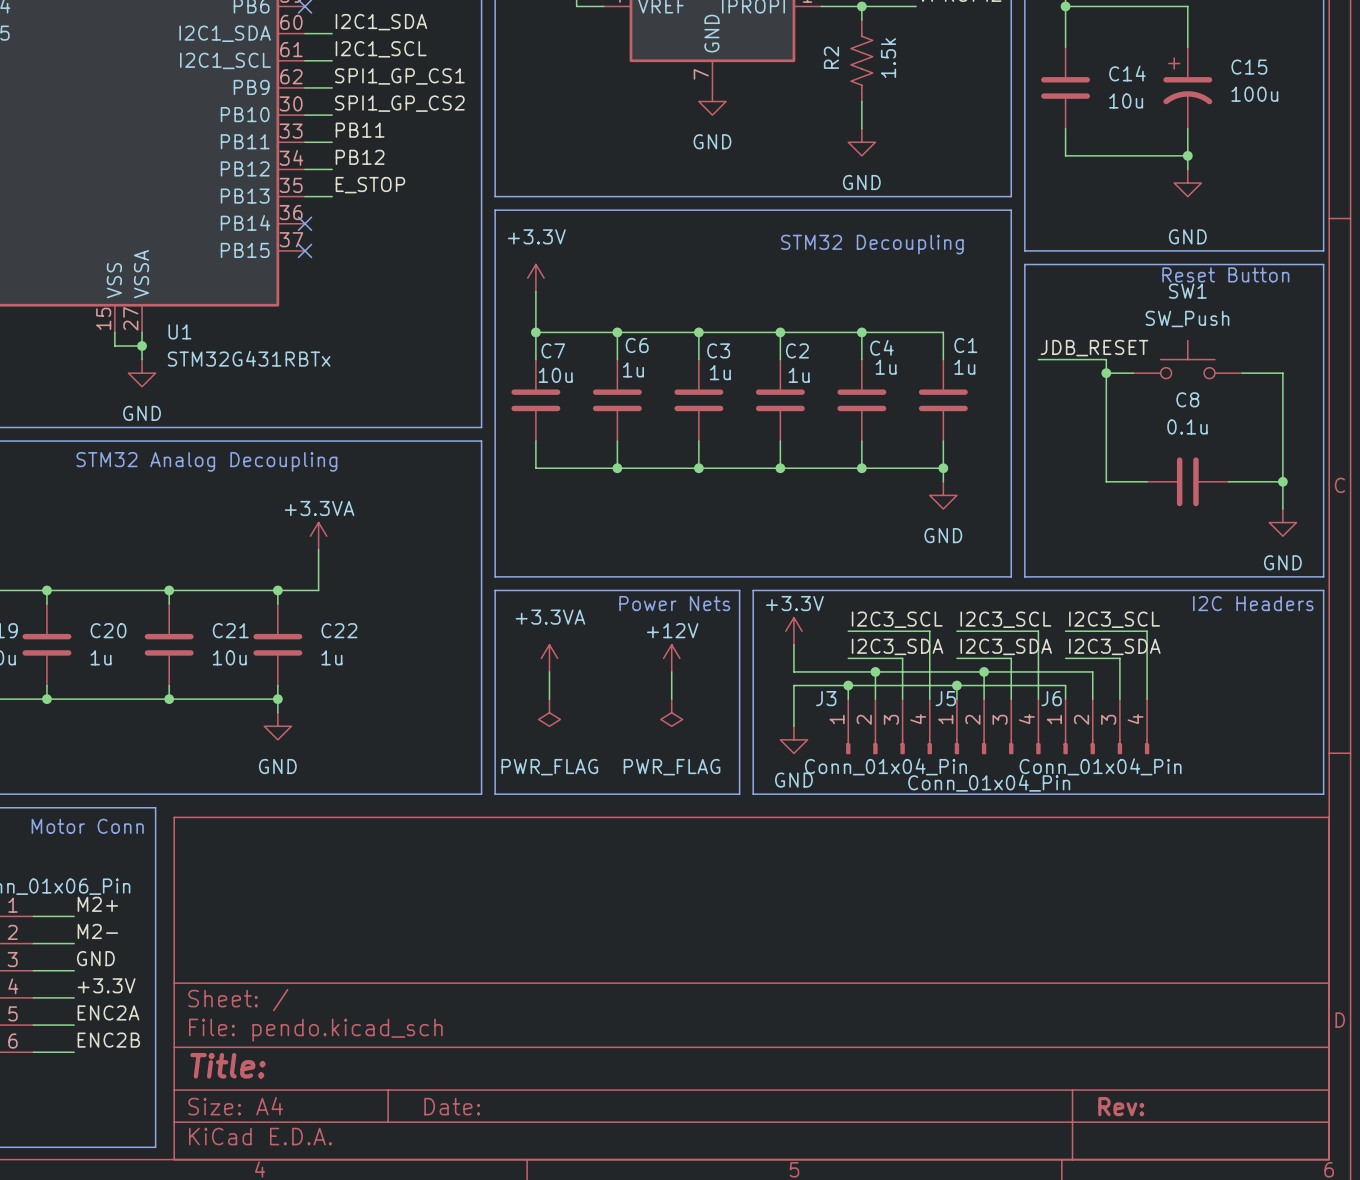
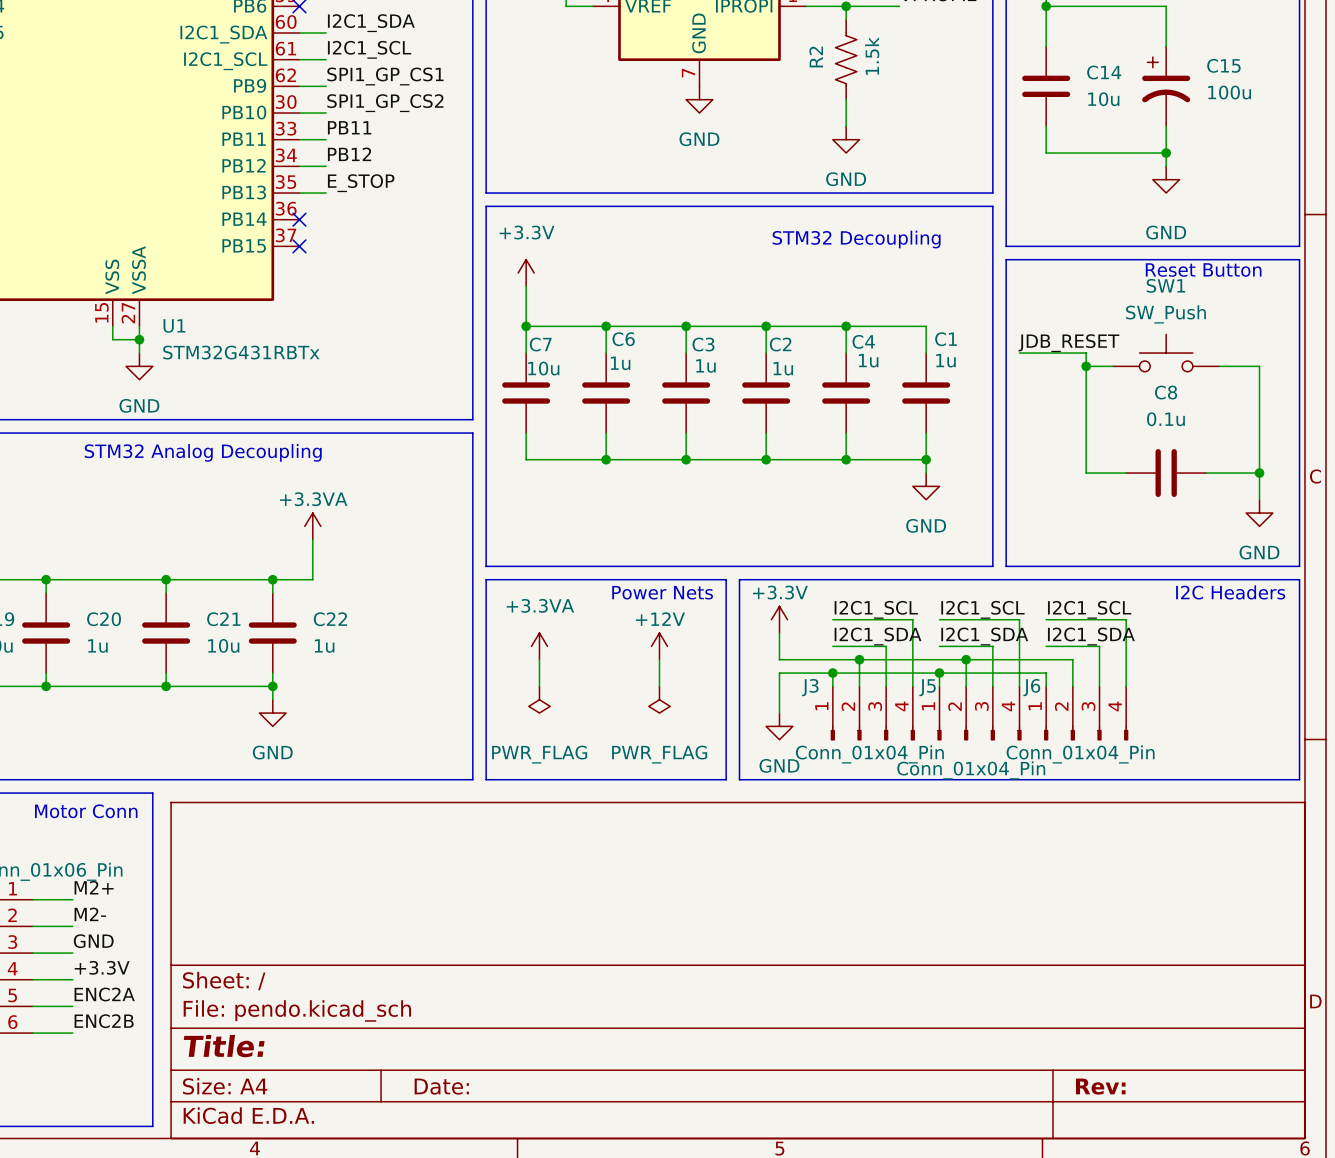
label: I2C3_SCL (897, 619) -> I2C1_SCL (876, 609)
label: I2C3_SCL (1005, 619) -> I2C1_SCL (982, 609)
label: I2C3_SCL (1114, 619) -> I2C1_SCL (1089, 609)
label: I2C3_SDA (897, 646) -> I2C1_SDA (878, 636)
label: I2C3_SDA (1006, 646) -> I2C1_SDA (984, 636)
label: I2C3_SDA (1114, 646) -> I2C1_SDA (1091, 636)

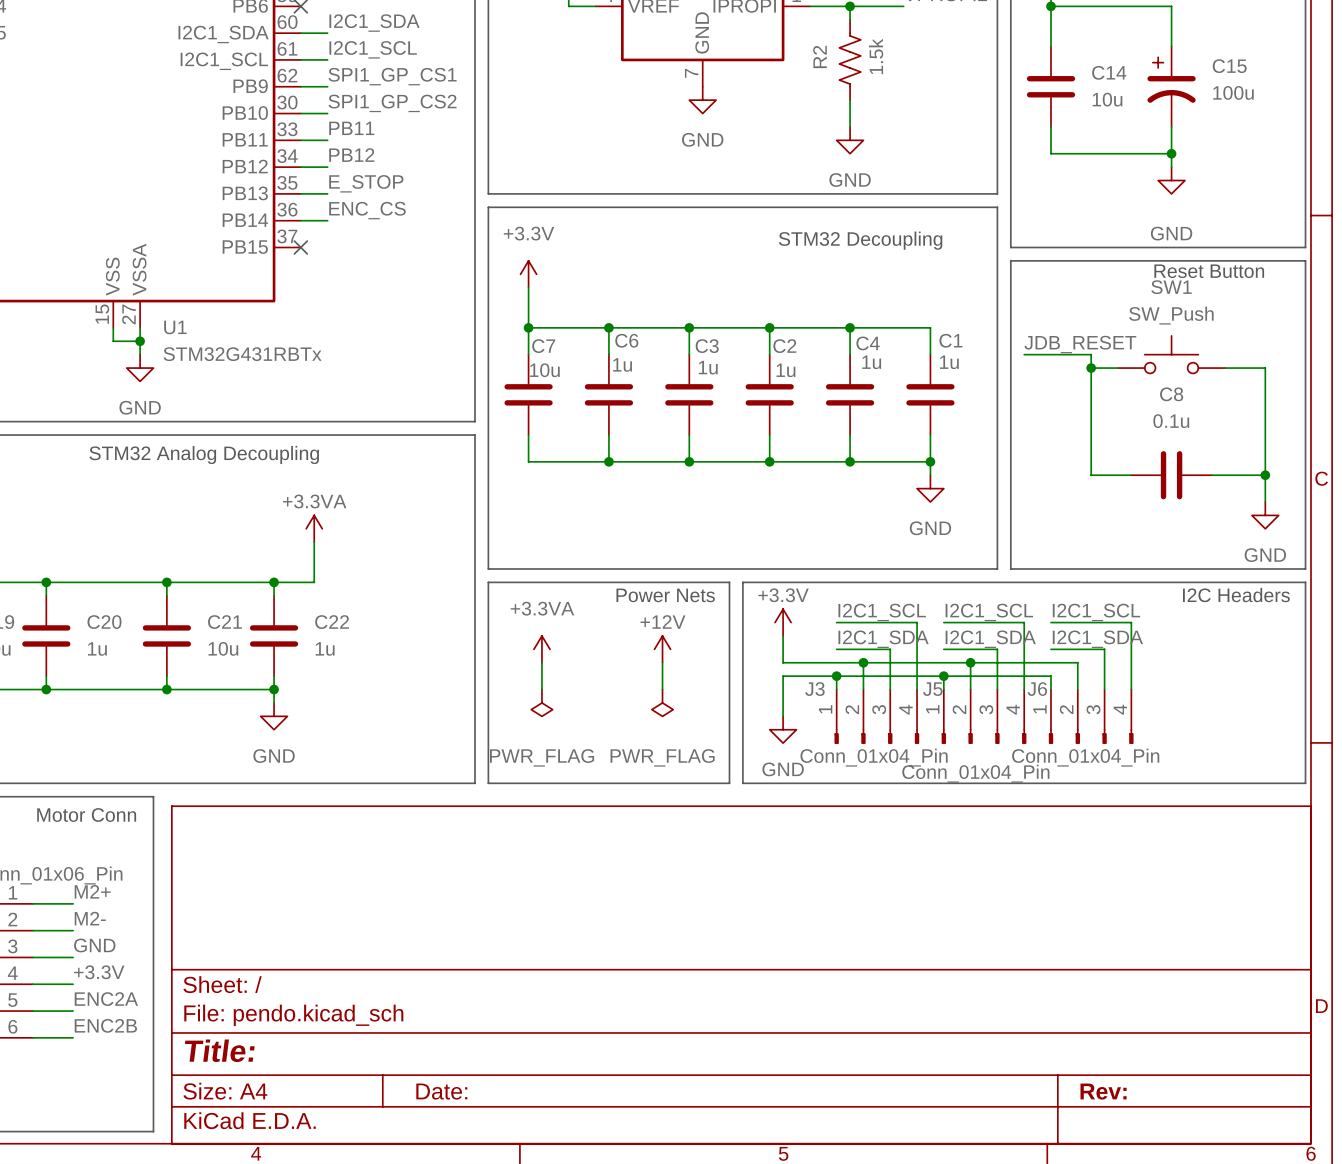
label: none -> ENC_CS (367, 210)
wire: none -> (300, 220) (327, 220)
no-connect mark: (299, 219) -> none

